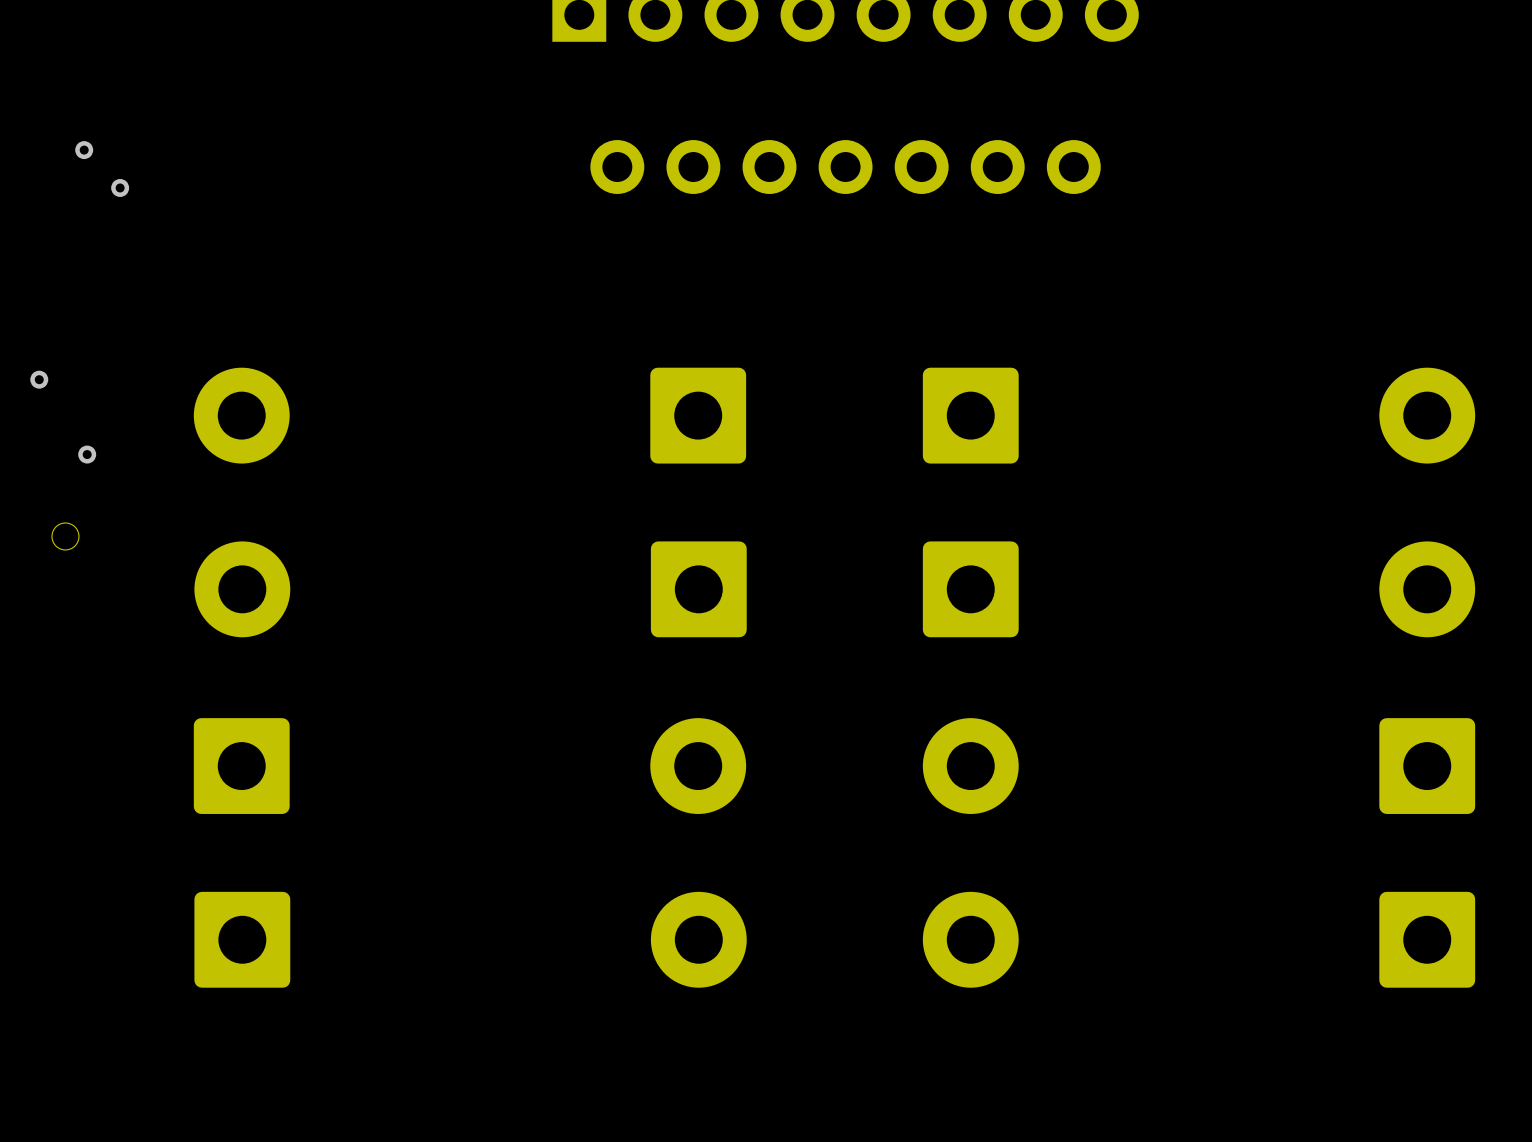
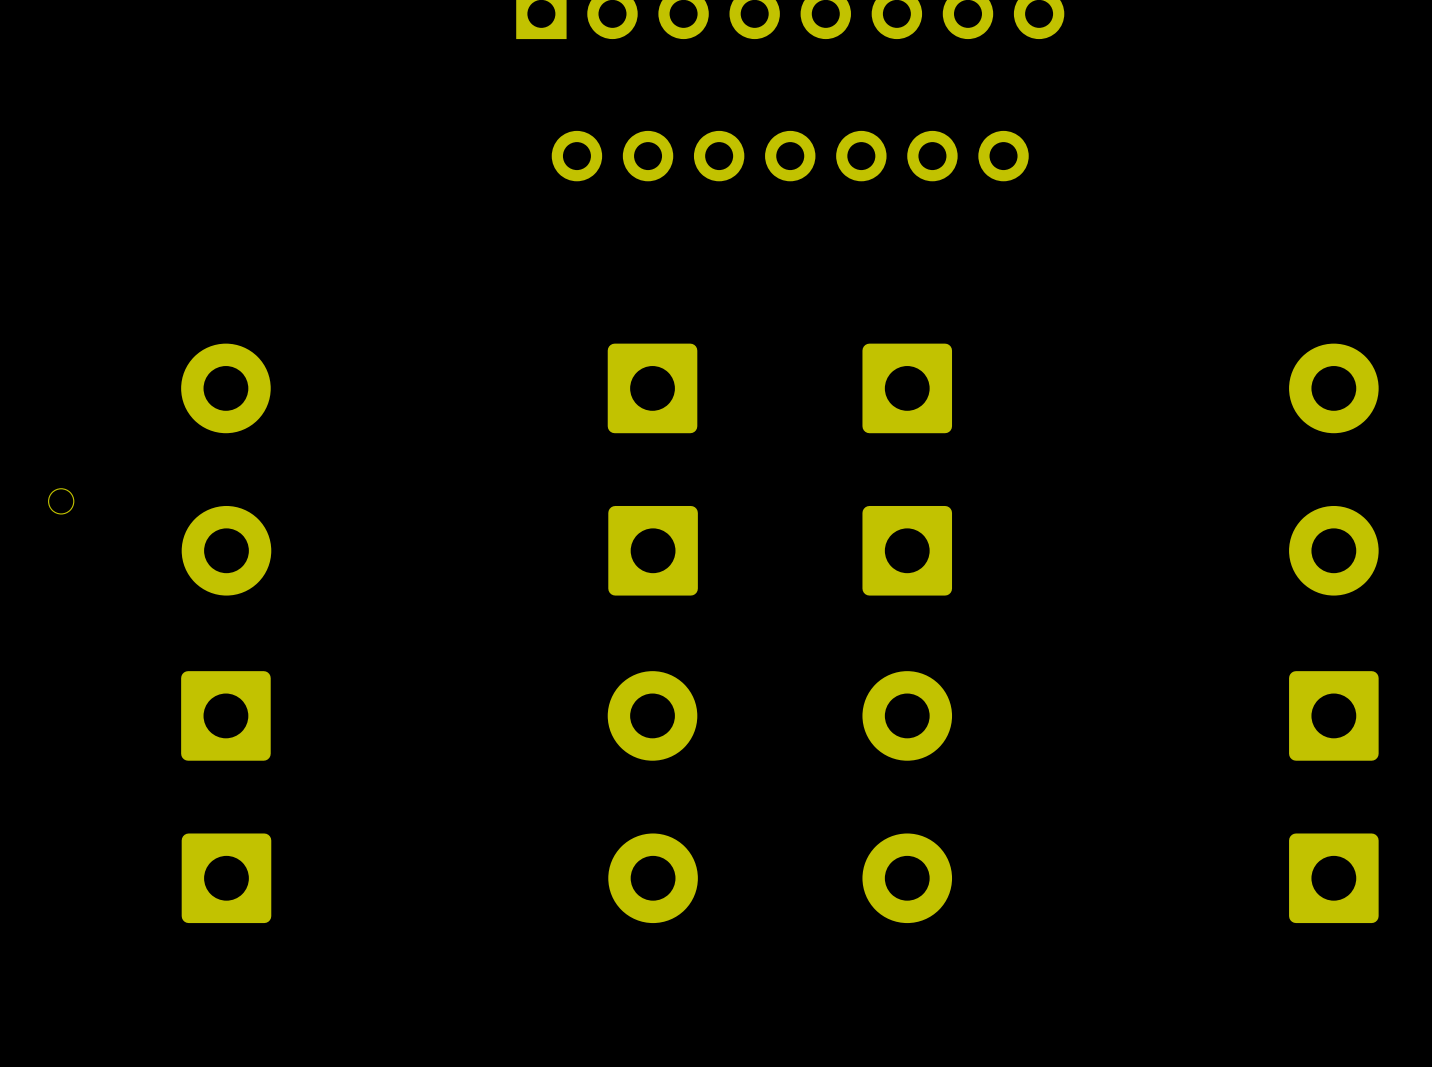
via: (84, 150) -> none
via: (120, 187) -> none
via: (39, 379) -> none
via: (87, 454) -> none

